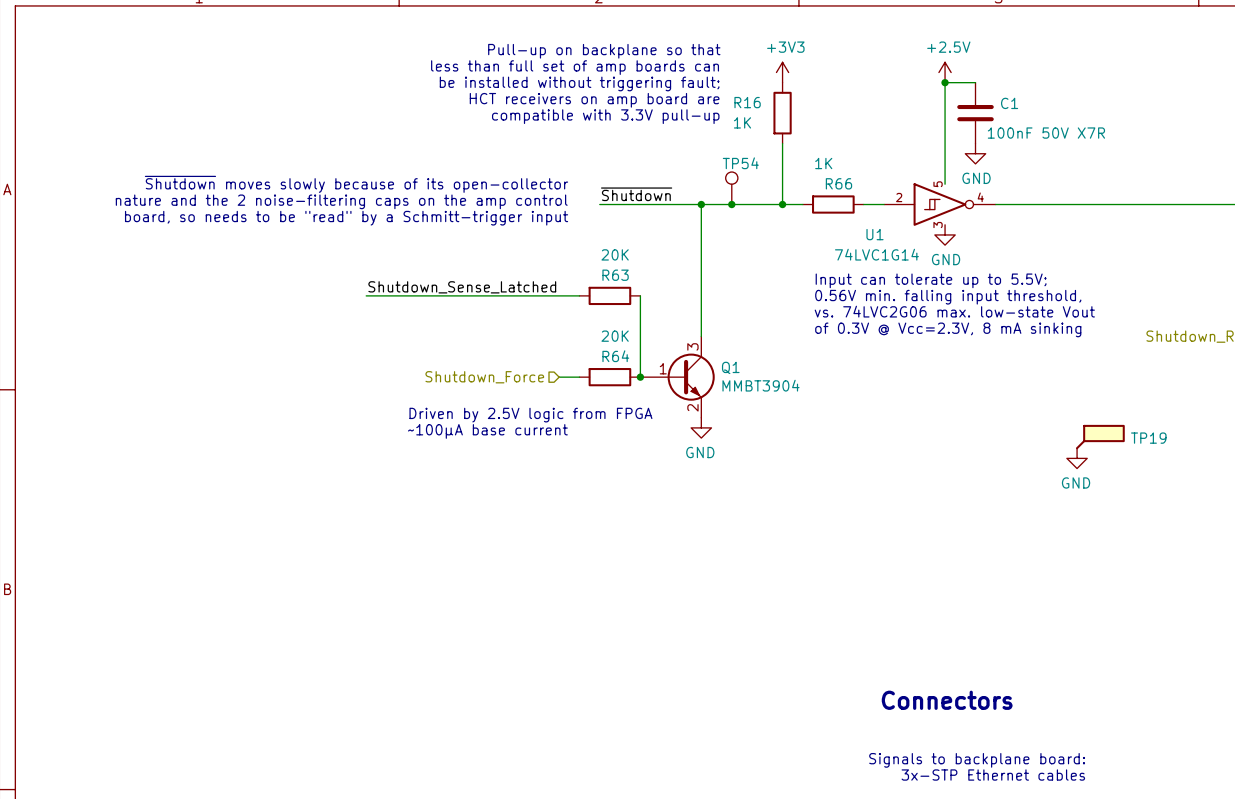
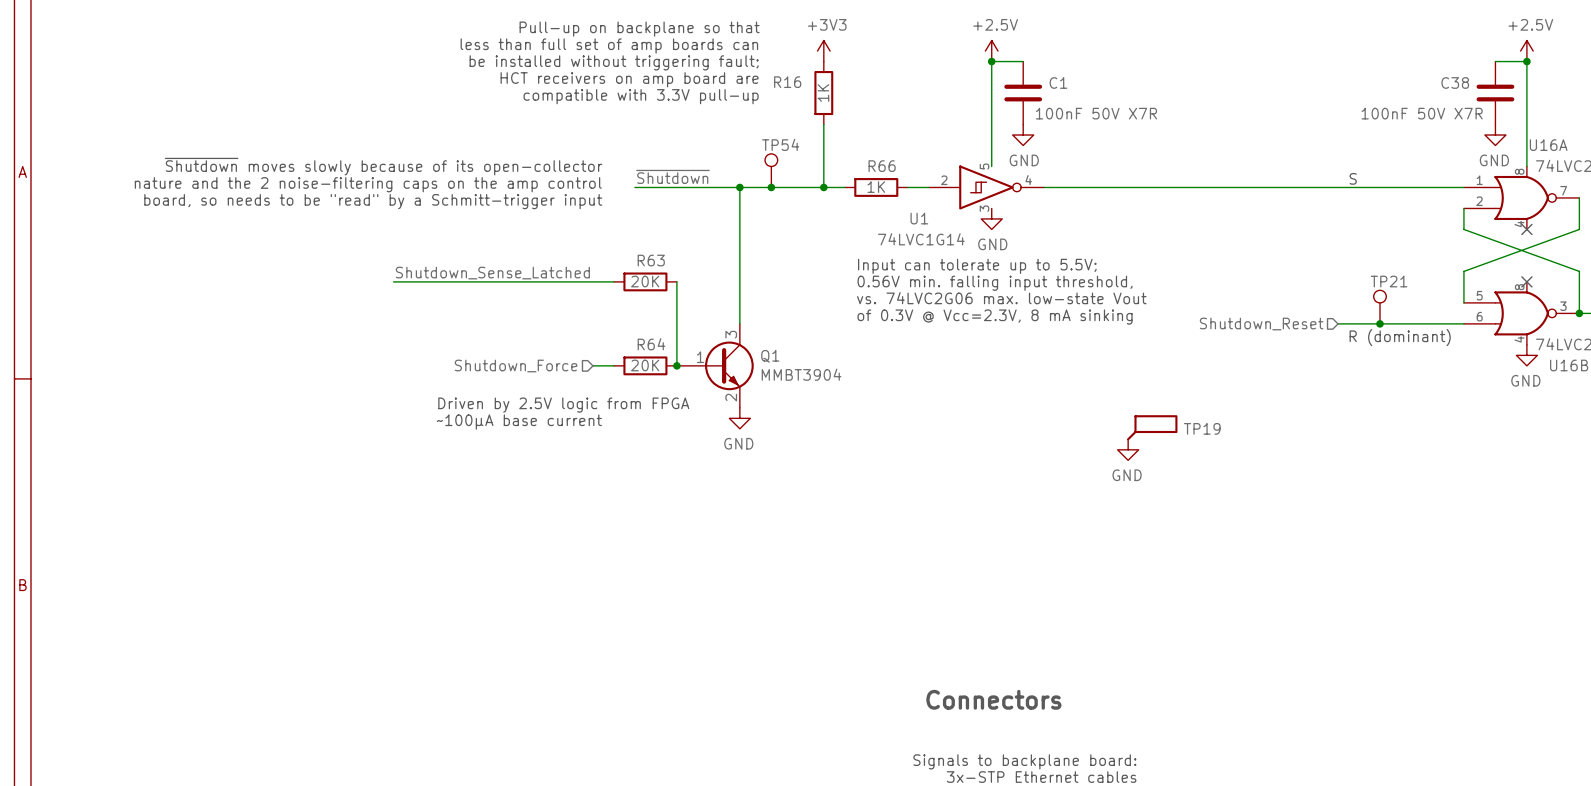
R16 value rotation: 0° (742, 122) -> 90° counterclockwise (823, 93)
R16 value position: 1K (742, 122) -> 1K (823, 93)
R66 value position: 1K (823, 163) -> 1K (876, 187)
R63 value position: 20K (615, 254) -> 20K (645, 281)
R64 value position: 20K (615, 336) -> 20K (645, 365)

